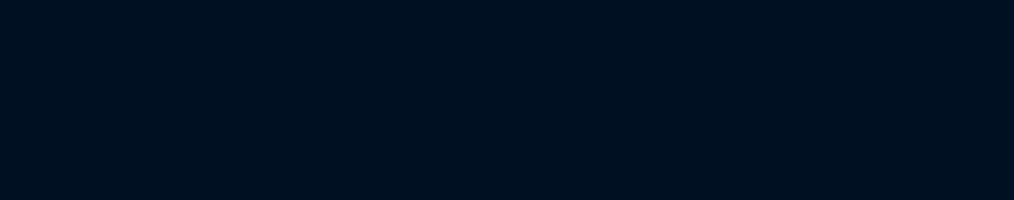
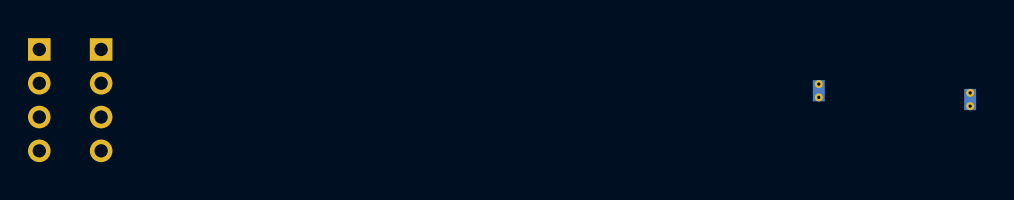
part: none -> (818, 90)
part: none -> (970, 99)
part: none -> (39, 100)
part: none -> (101, 100)

